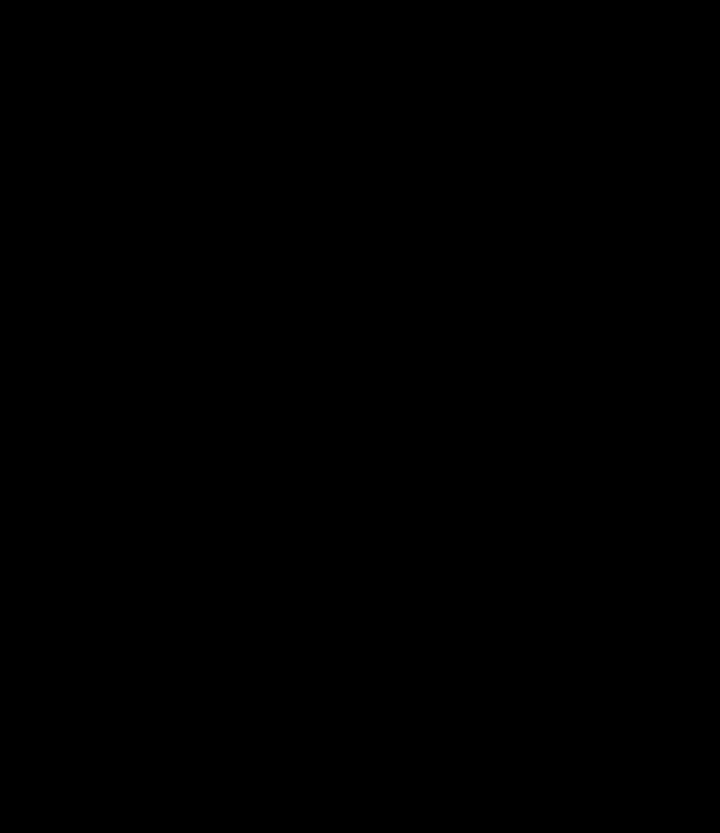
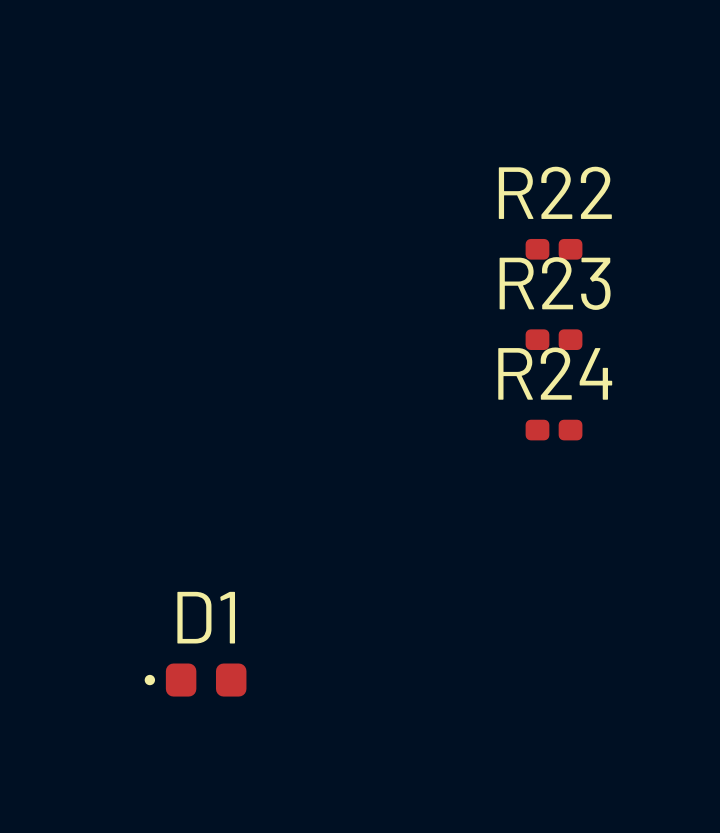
R22: none -> (554, 249)
R23: none -> (554, 339)
R24: none -> (554, 430)
D1: none -> (195, 680)

